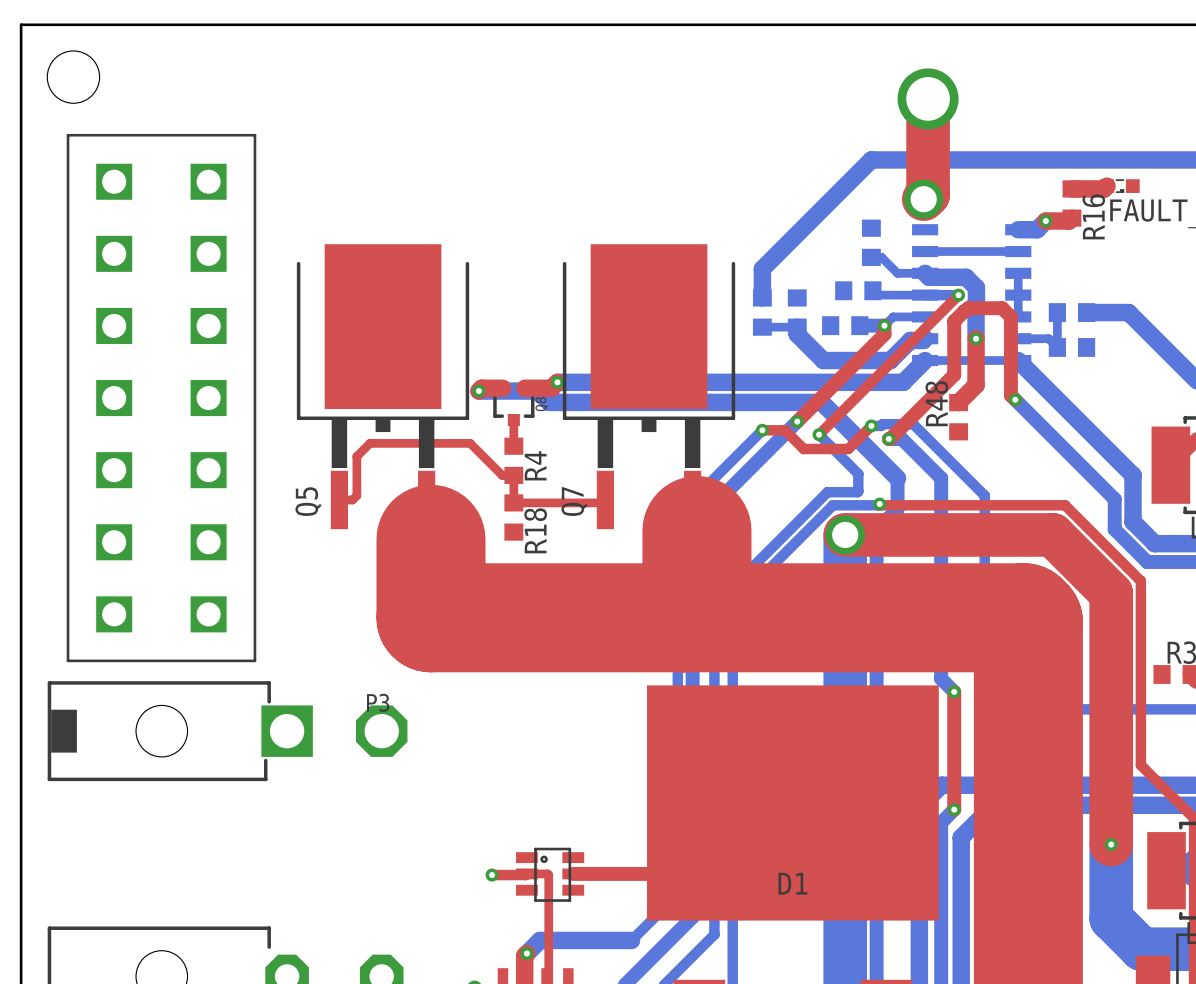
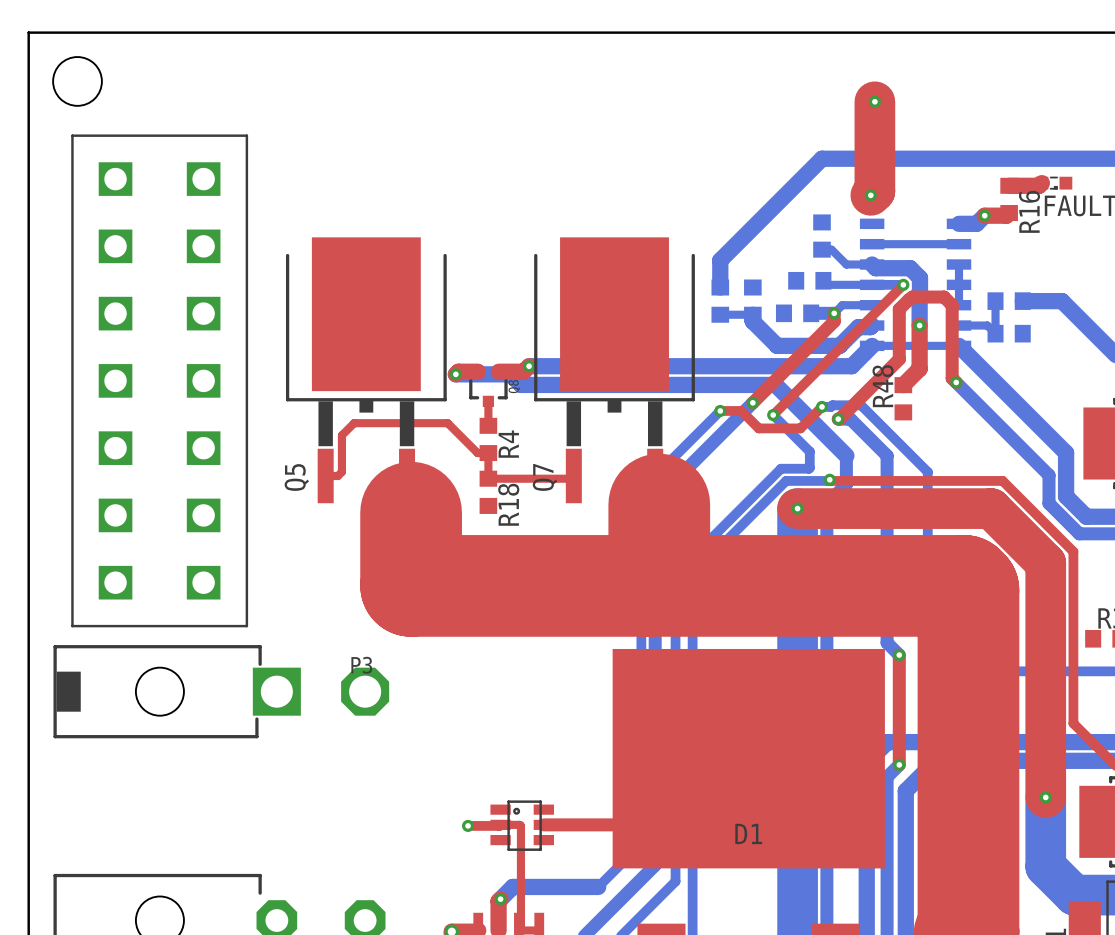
via size: [897, 68, 959, 130] -> [868, 95, 881, 108]
via size: [904, 179, 944, 219] -> [864, 189, 877, 202]
via size: [825, 515, 865, 555] -> [791, 502, 804, 515]

